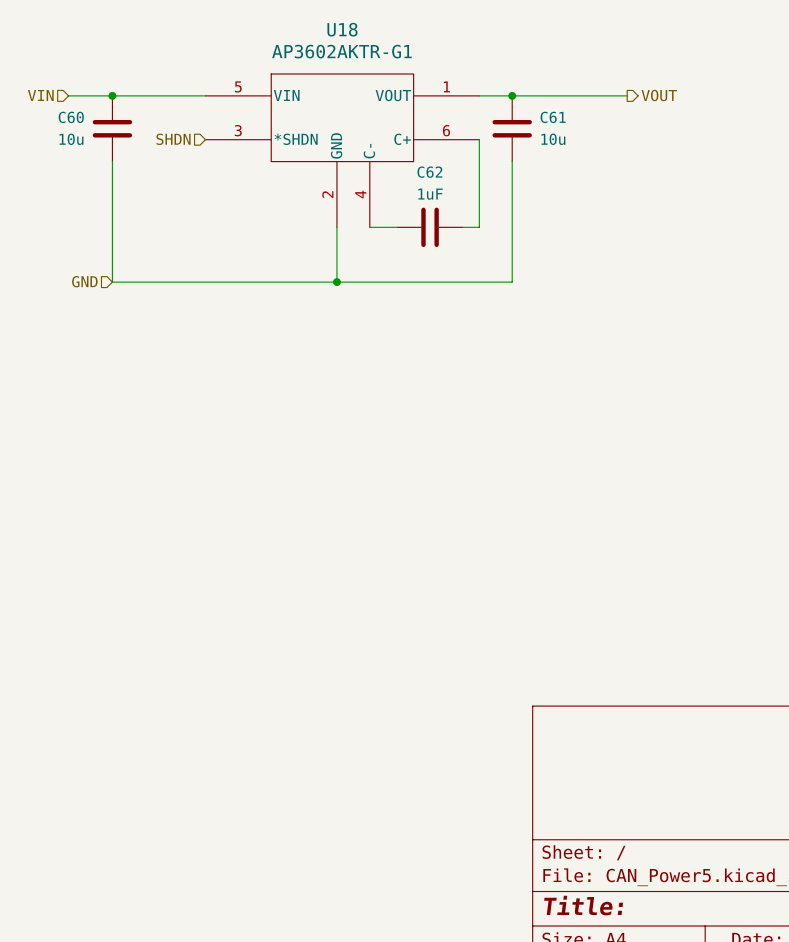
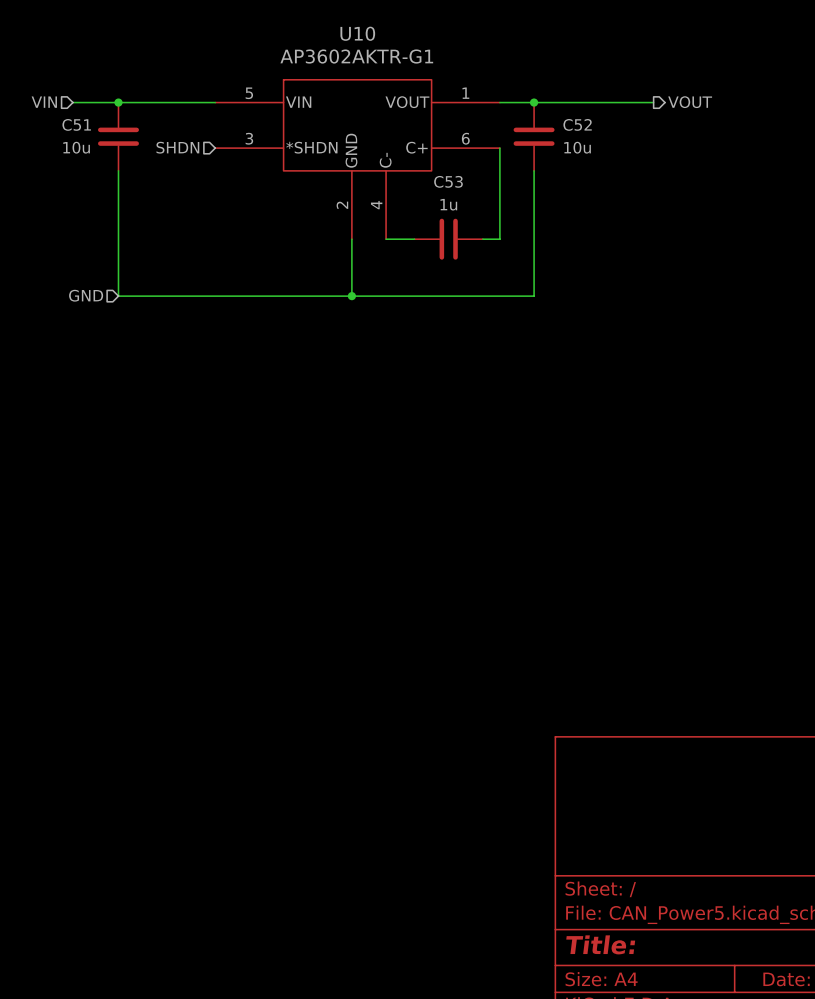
U18 name: U18 (342, 29) -> U10 (357, 33)
C60 name: C60 (71, 117) -> C51 (76, 124)
C61 name: C61 (553, 117) -> C52 (577, 124)
C62 name: C62 (429, 172) -> C53 (448, 181)
C62 value: 1uF (430, 194) -> 1u (448, 204)

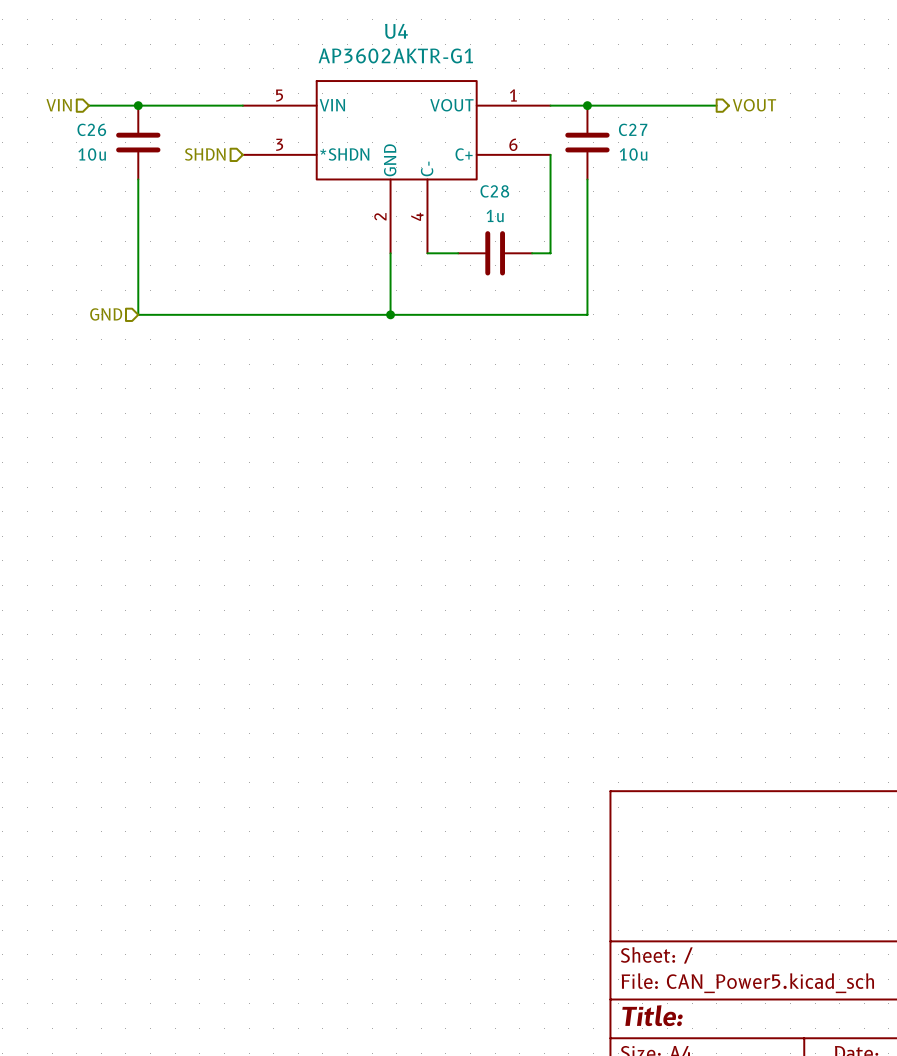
U10 name: U10 (357, 33) -> U4 (396, 31)
C51 name: C51 (76, 124) -> C26 (91, 129)
C52 name: C52 (577, 124) -> C27 (633, 129)
C53 name: C53 (448, 181) -> C28 (494, 191)

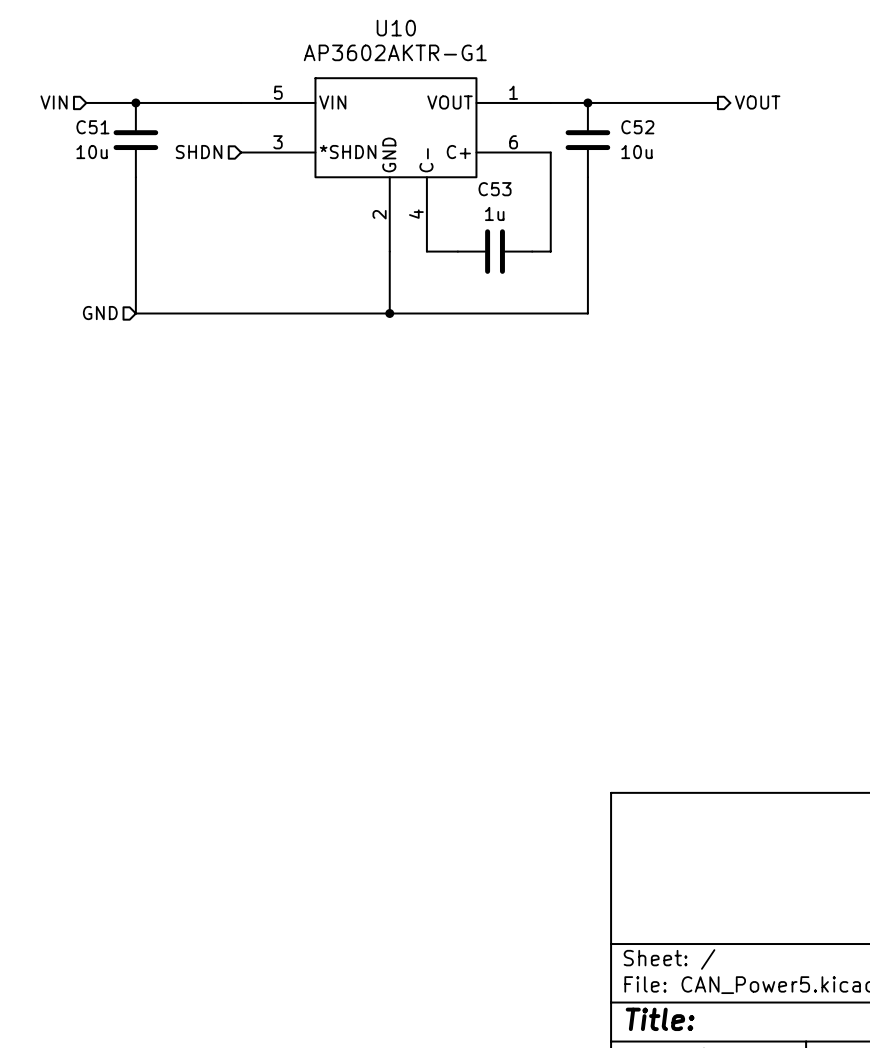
U4 name: U4 (396, 31) -> U10 (396, 28)
C26 name: C26 (91, 129) -> C51 (92, 127)
C27 name: C27 (633, 129) -> C52 (637, 127)
C28 name: C28 (494, 191) -> C53 (495, 189)

